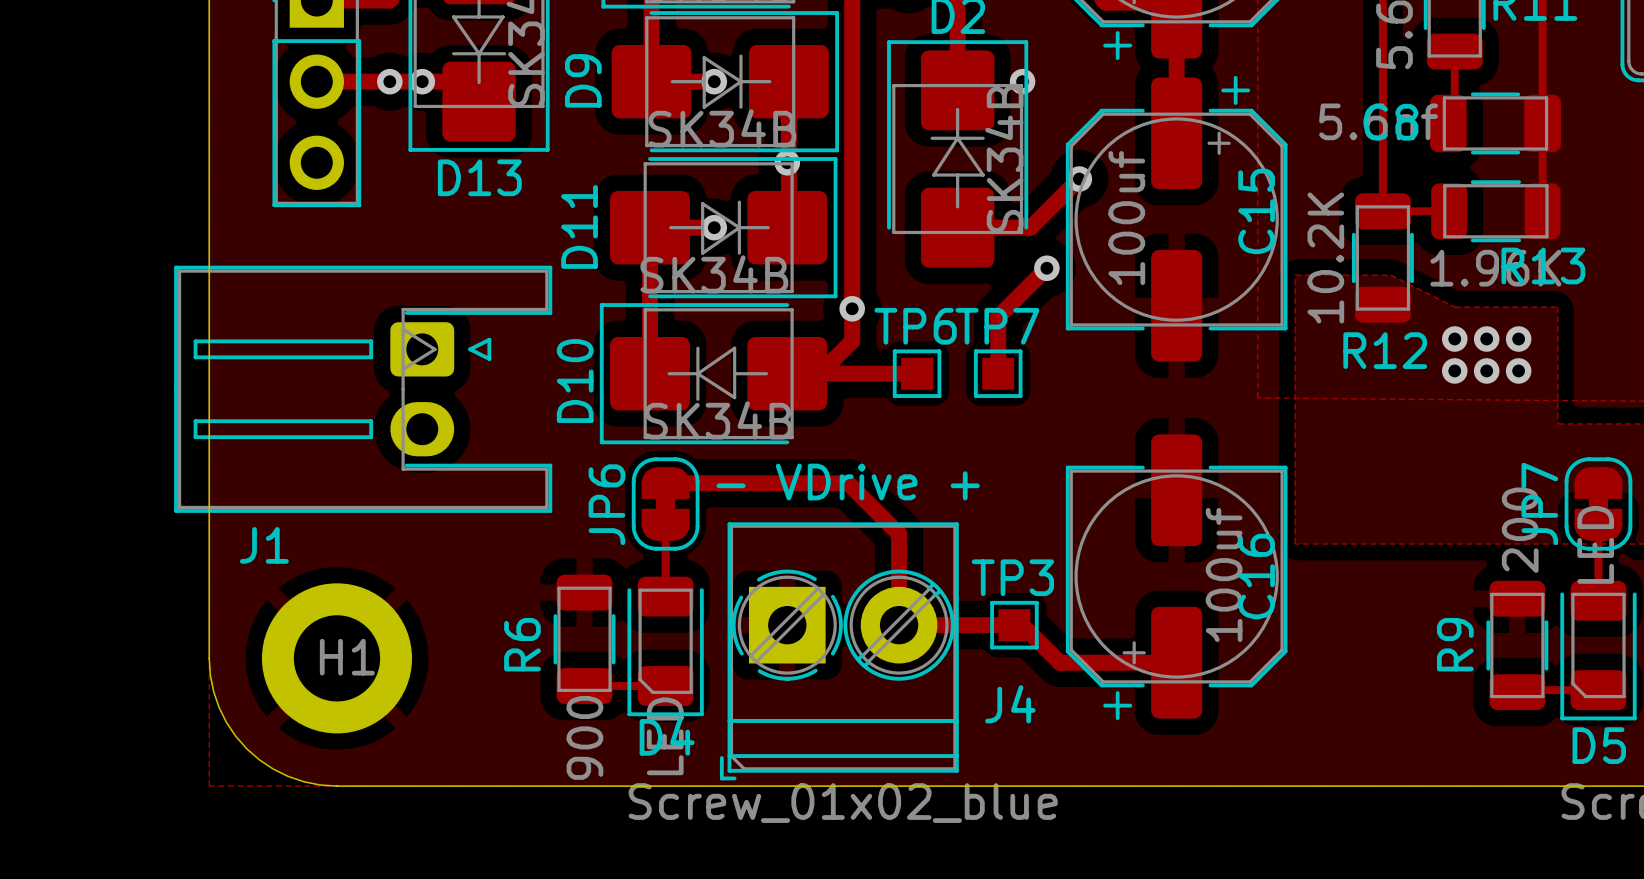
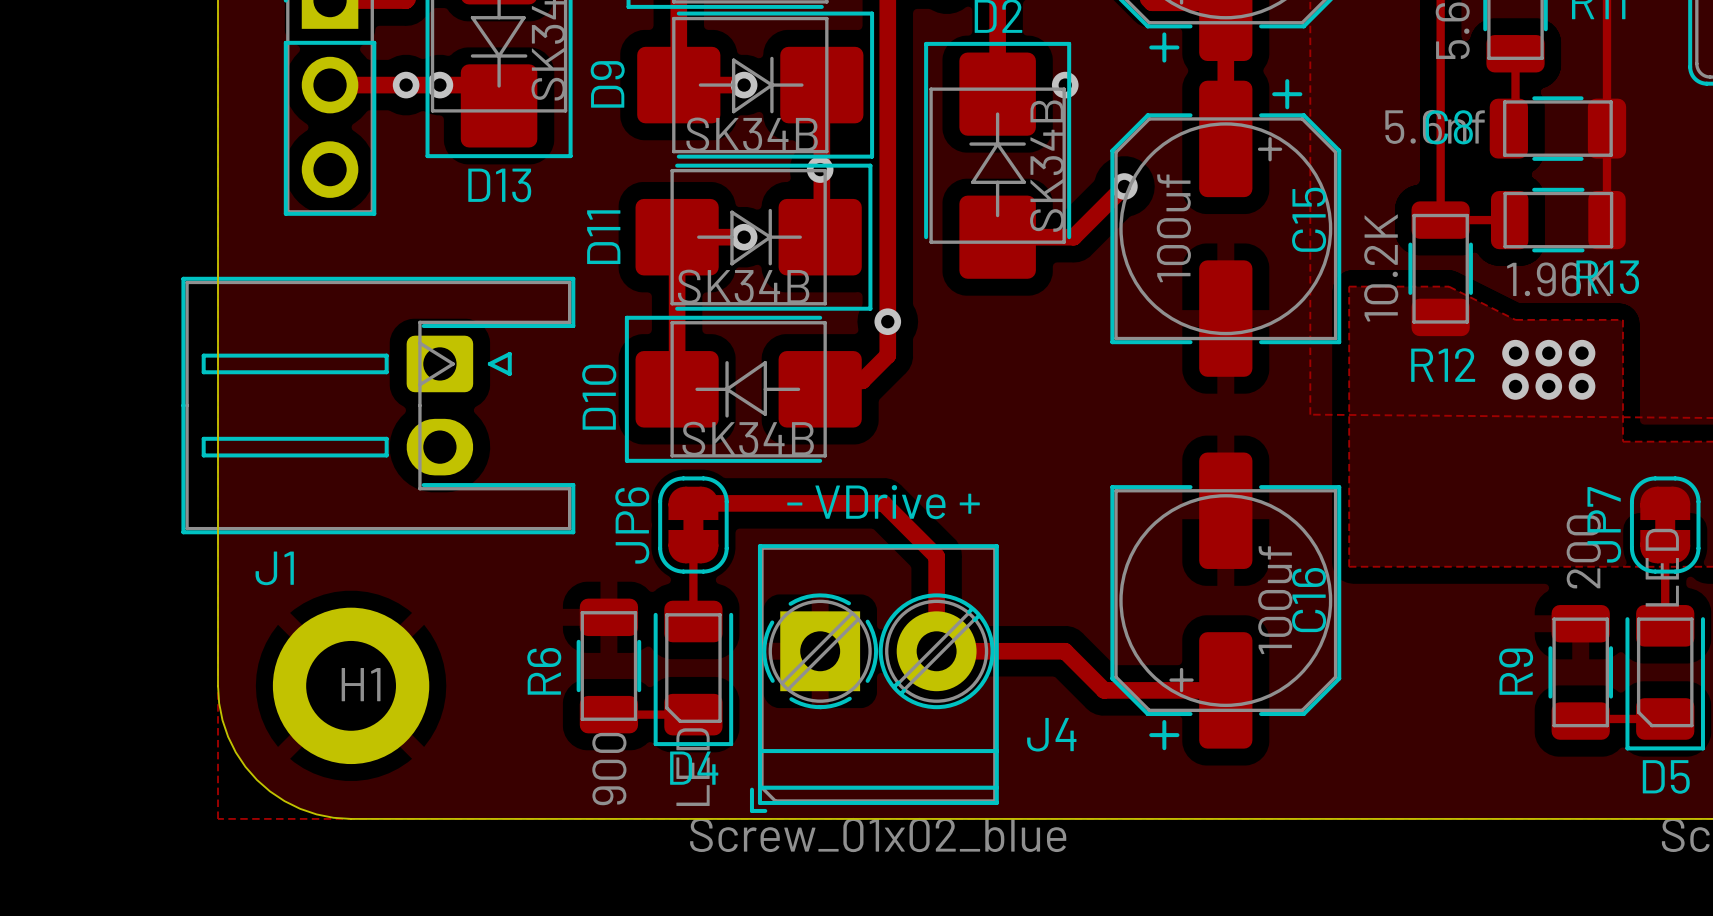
track: (1046, 268) (998, 316) (998, 373) -> none
via: (1046, 268) -> none
track: (787, 373) (917, 373) -> none
TP6: (917, 373) -> none
TP7: (998, 373) -> none
TP3: (1014, 625) -> none

